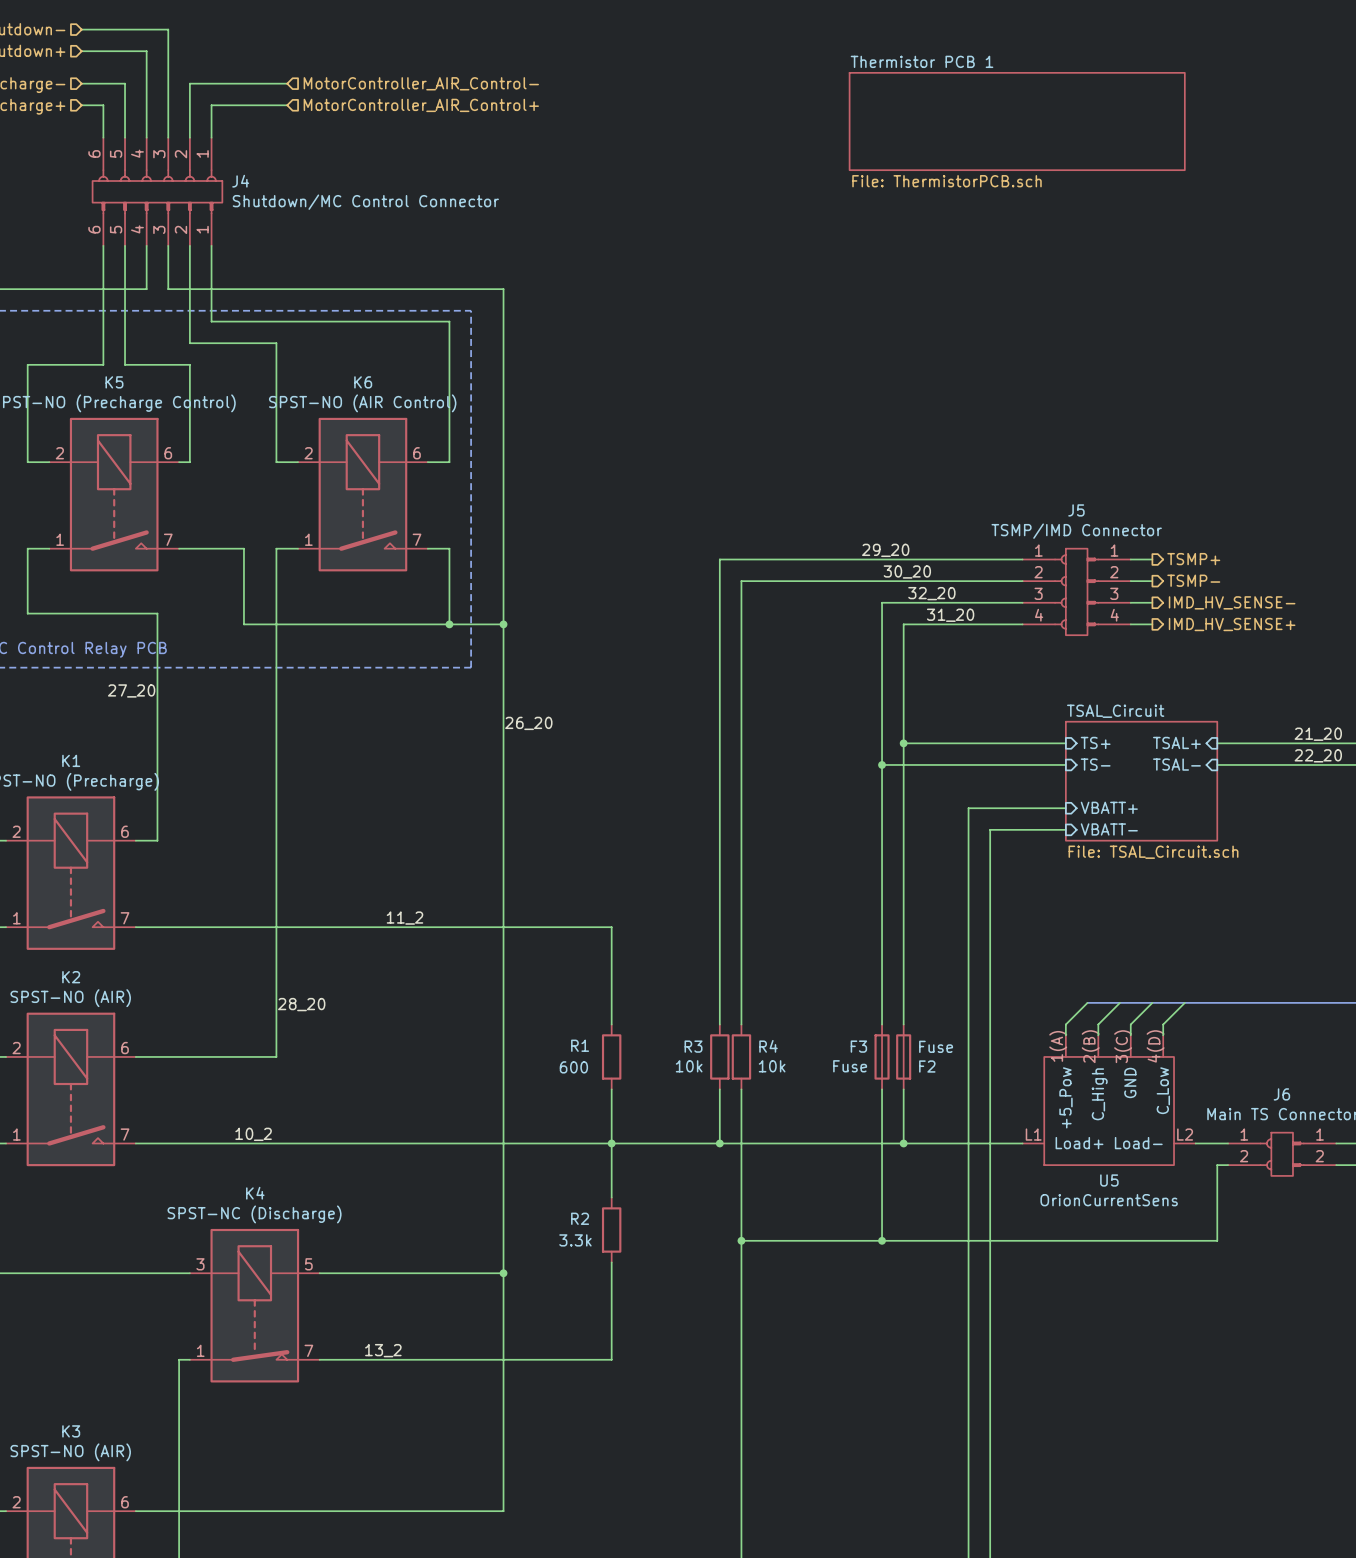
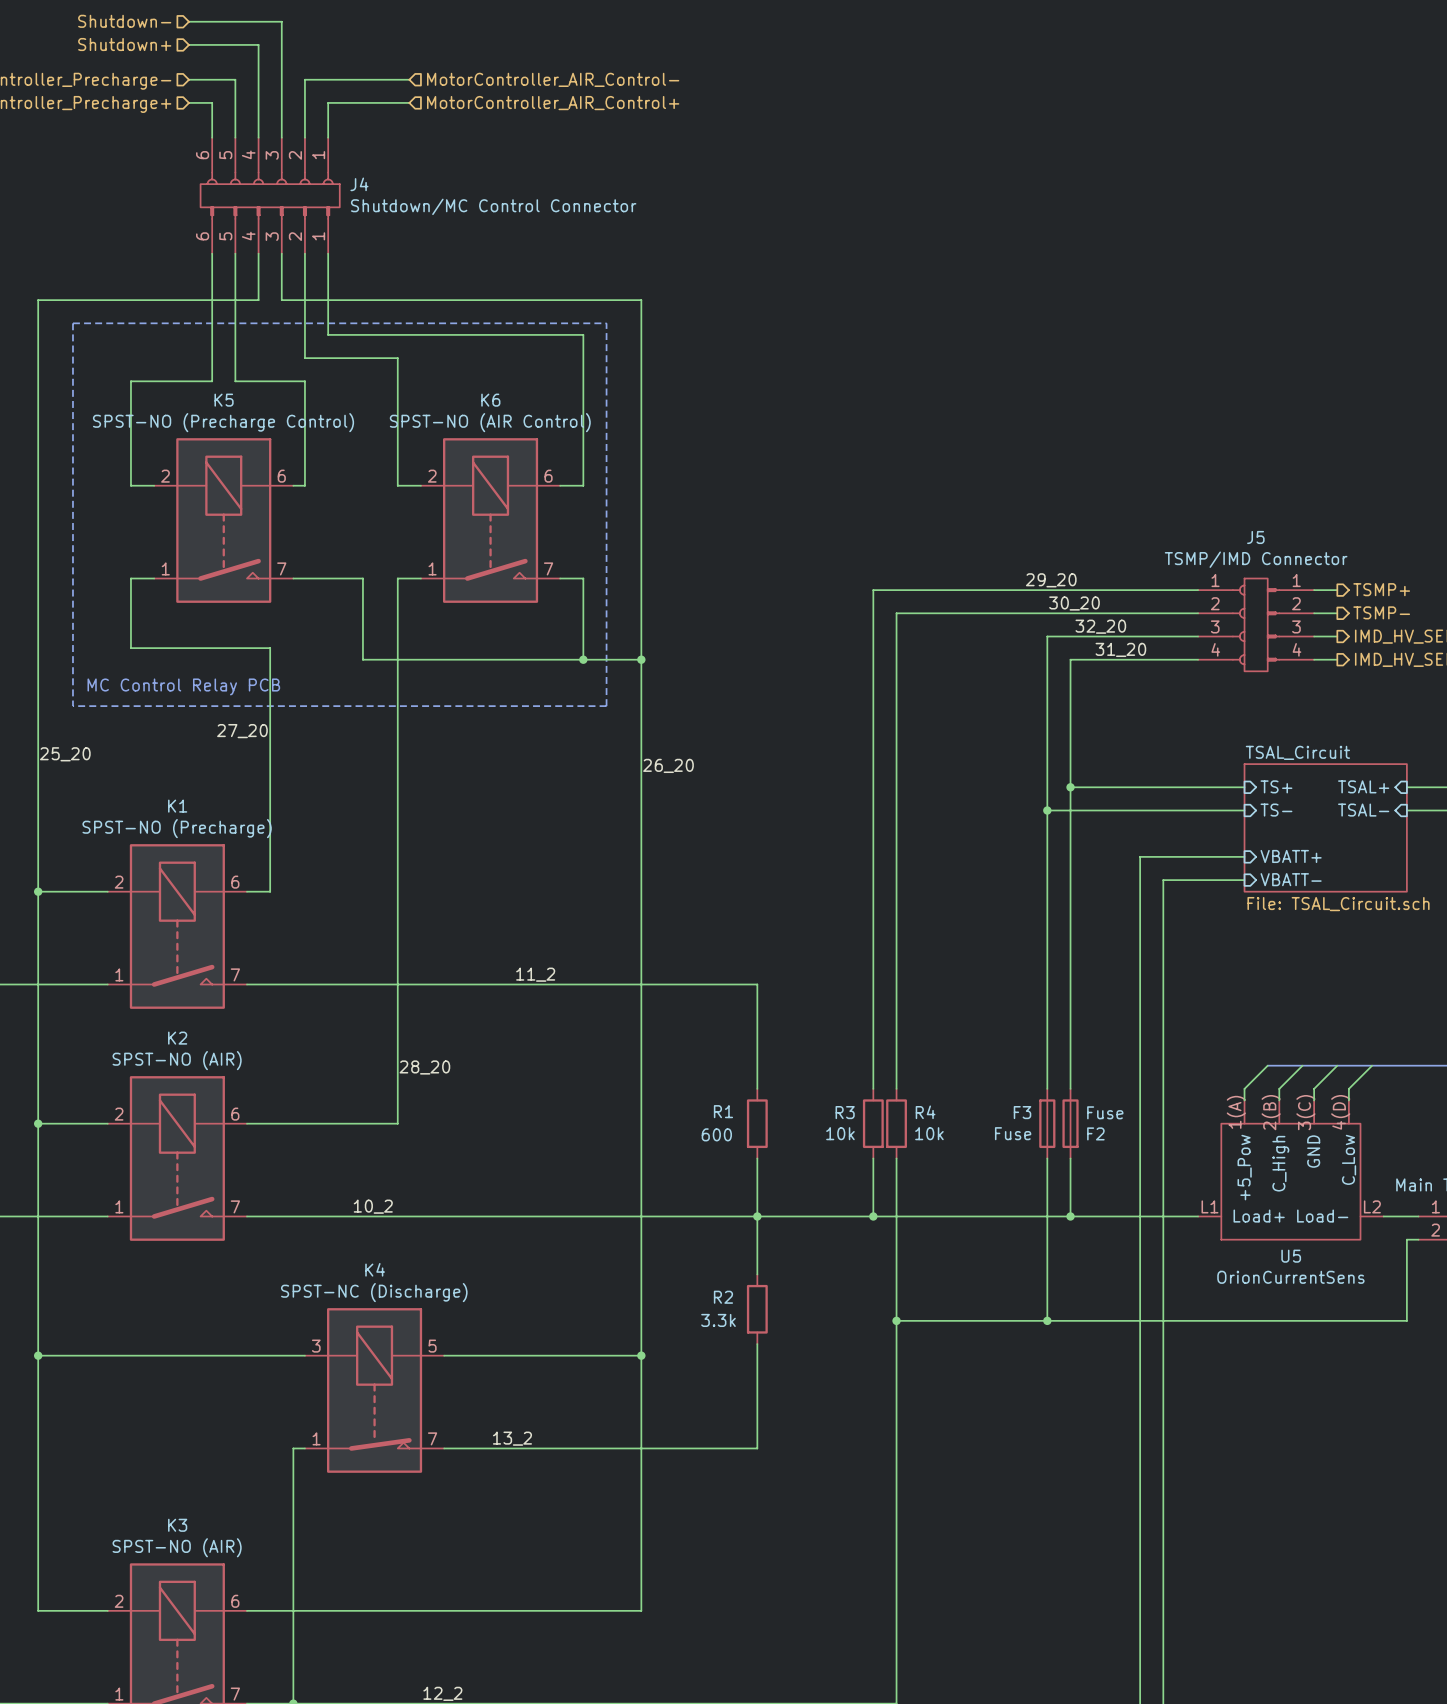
sheet Thermistor PCB 1: File: ThermistorPCB.sch (1017, 121) -> none

